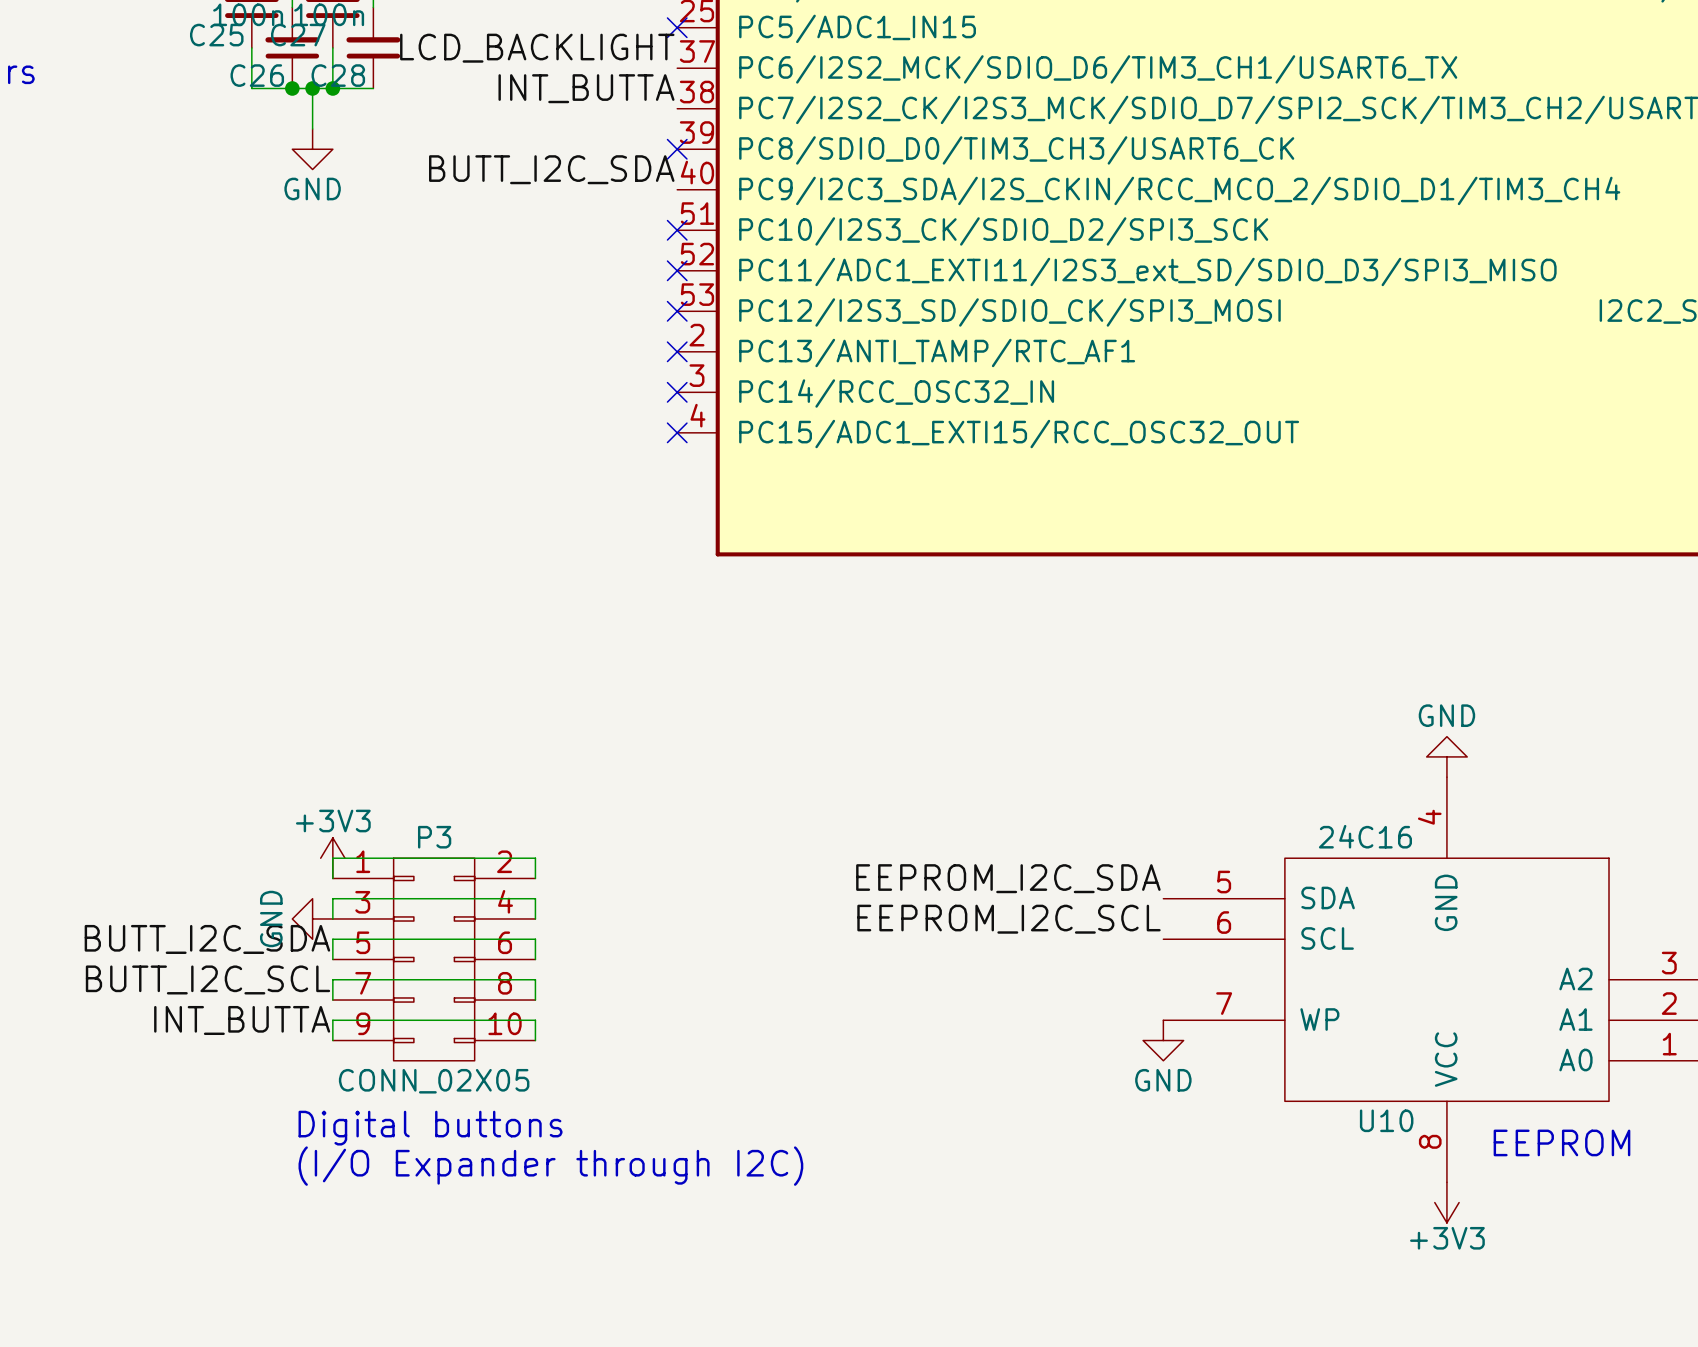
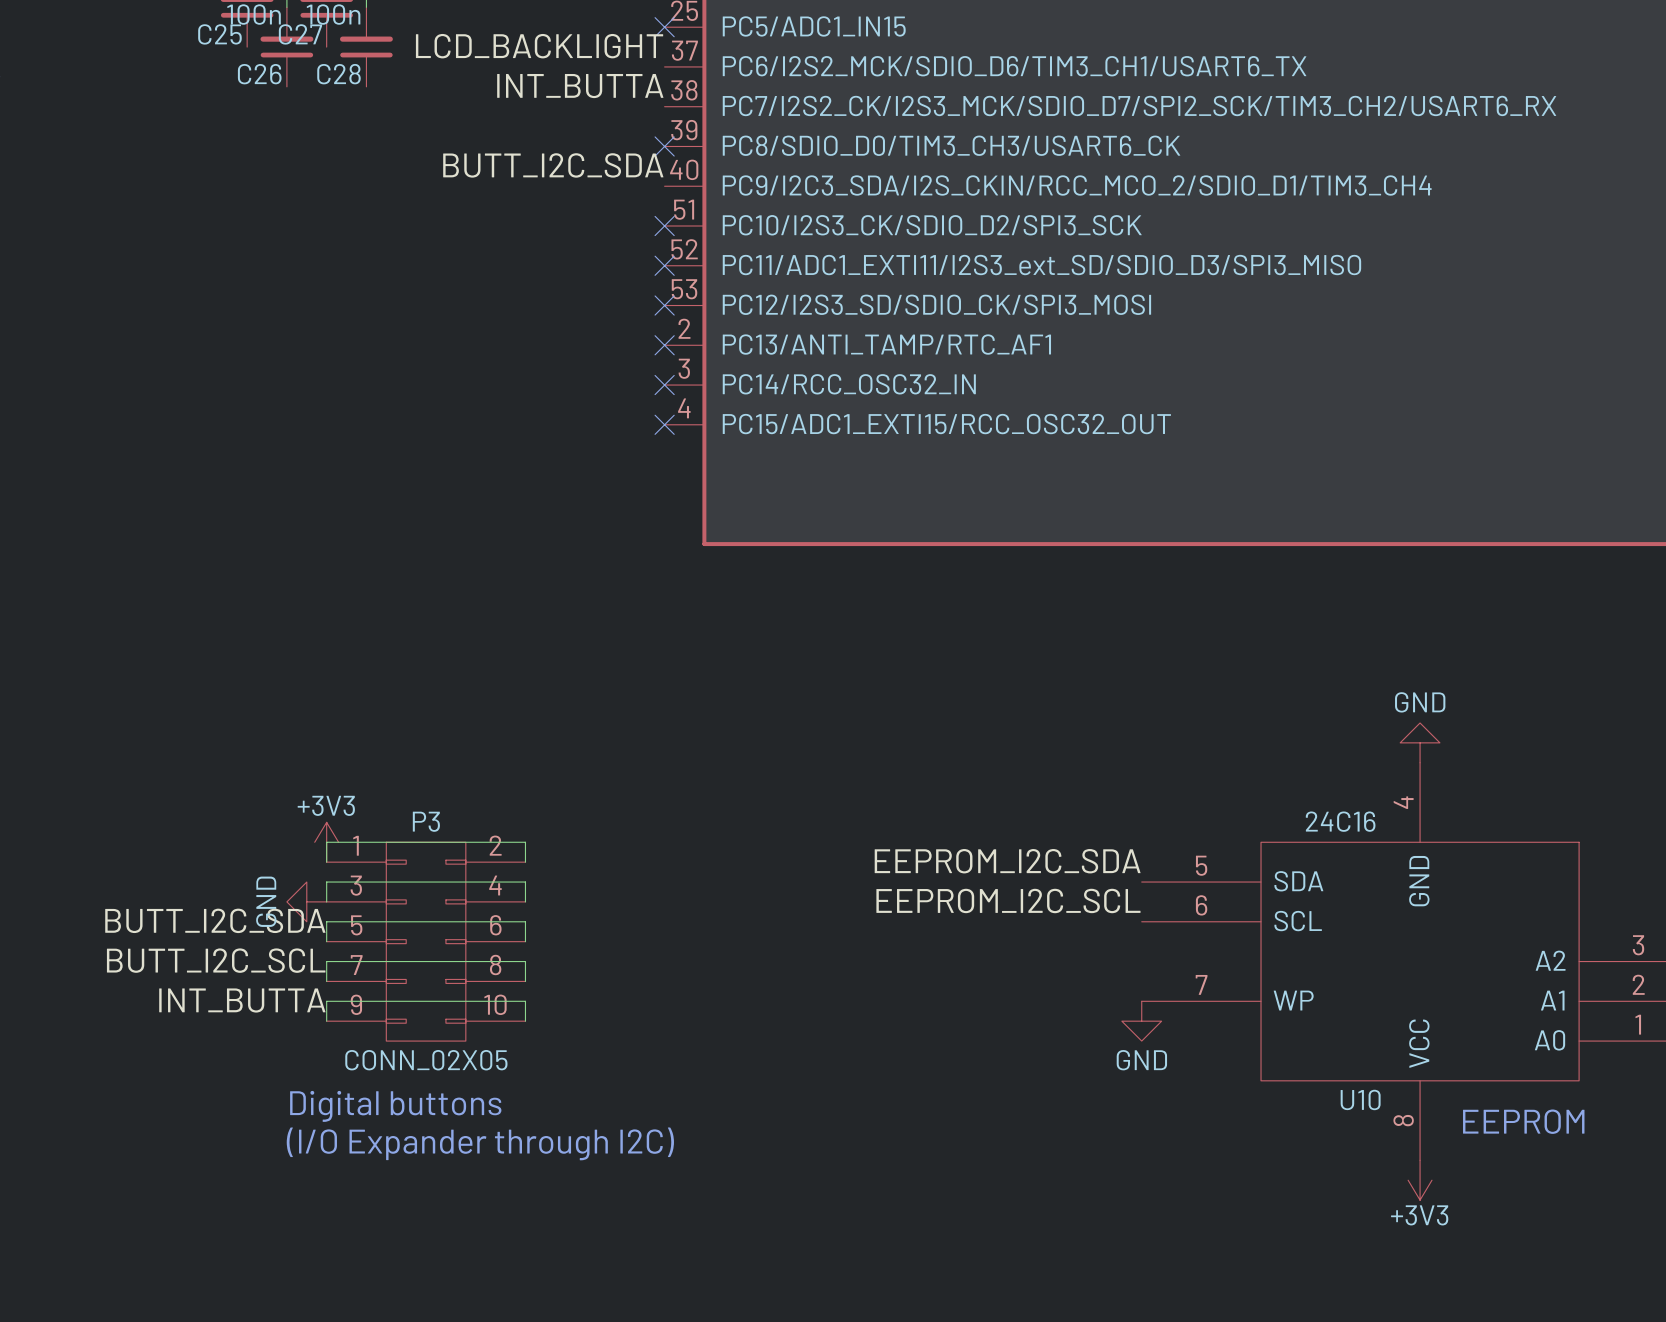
wire: (251, 47) (251, 88) (373, 88) -> none
wire: (332, 47) (332, 88) -> none
junction: (292, 88) -> none
wire: (312, 88) (312, 128) -> none
junction: (312, 88) -> none
junction: (332, 88) -> none
power symbol: GND (312, 149) -> none

